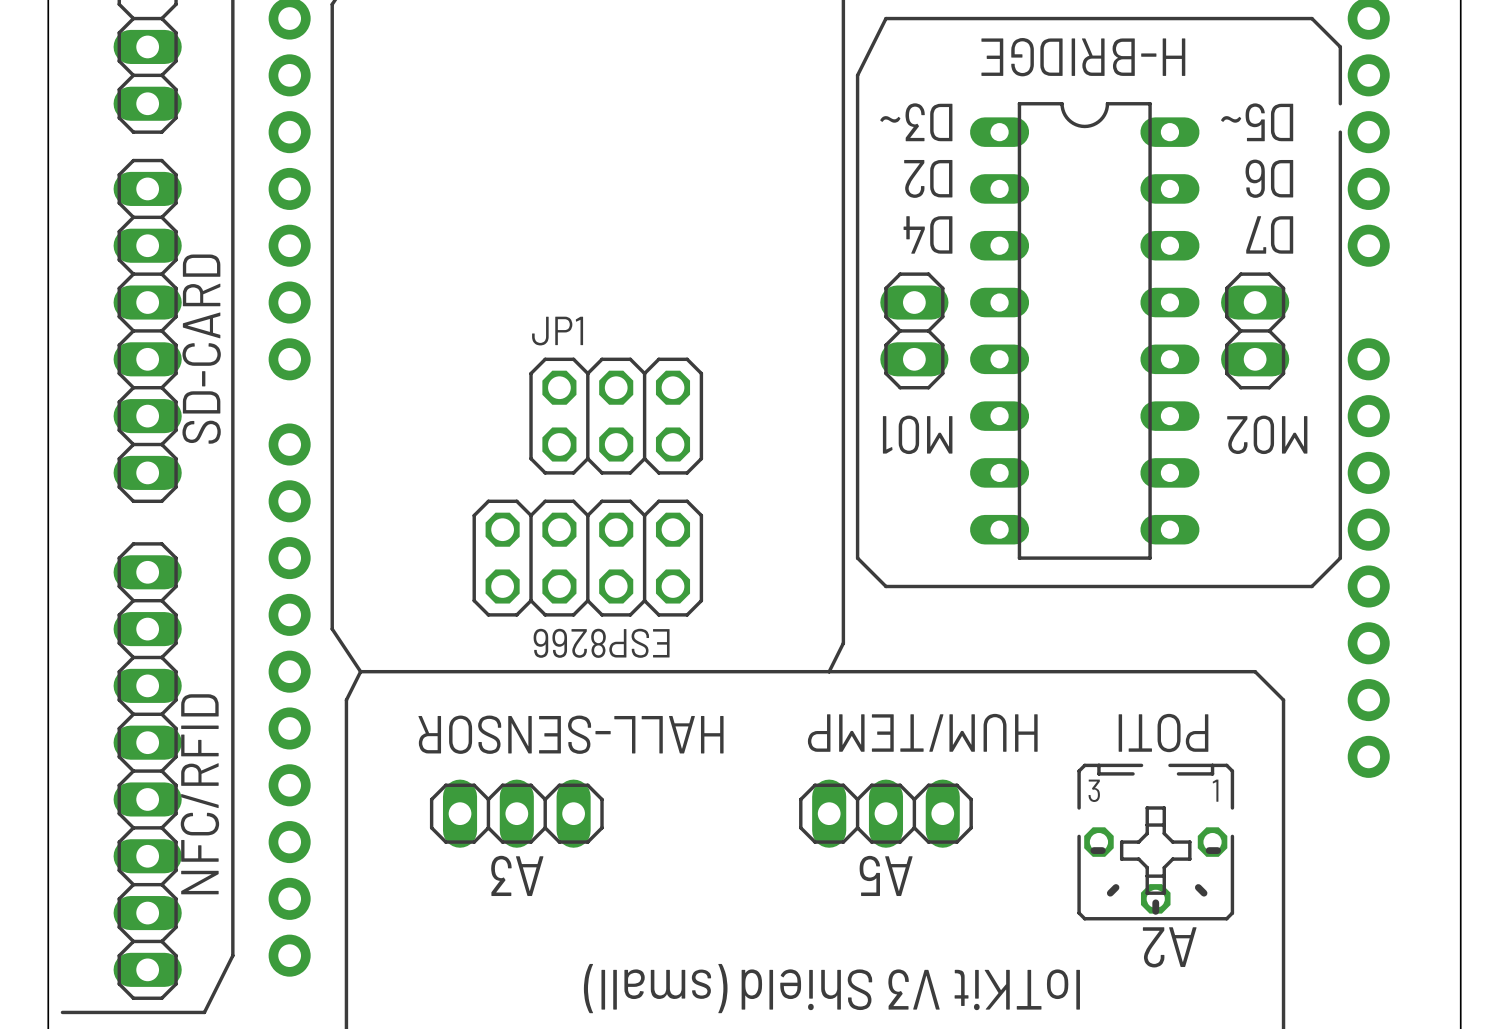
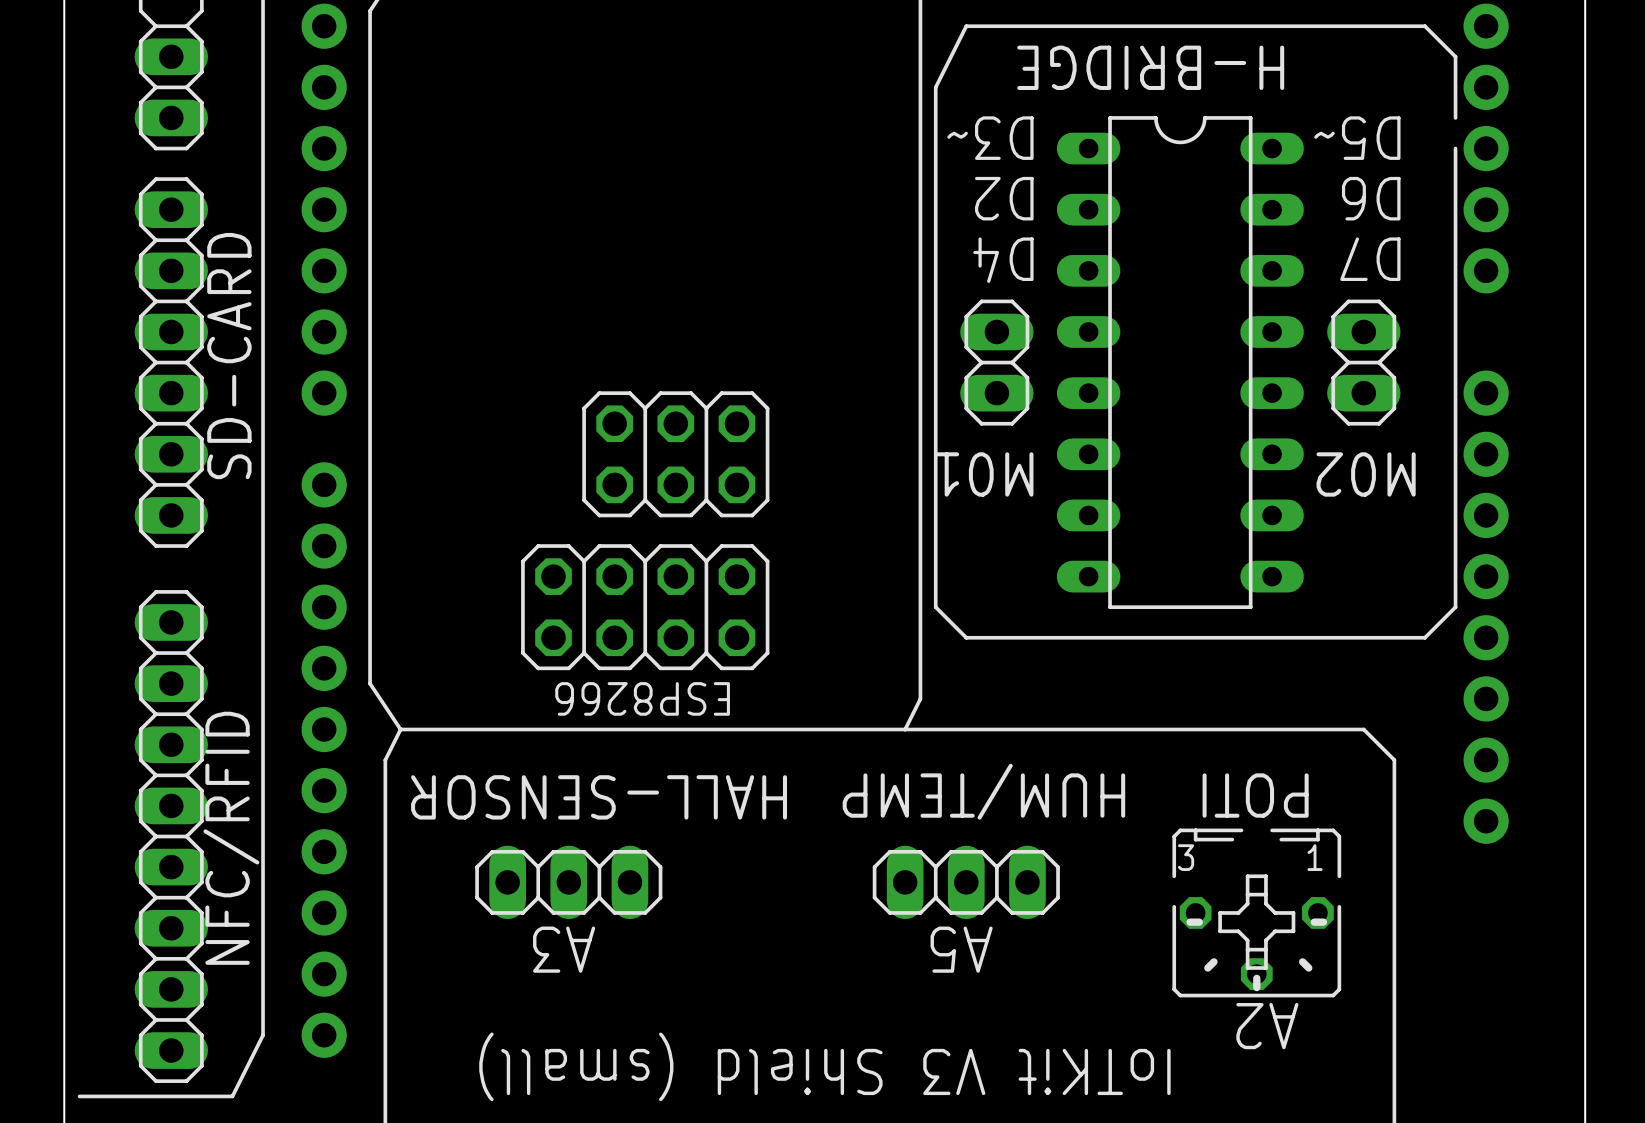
JP1 name: JP1 (557, 331) -> none

